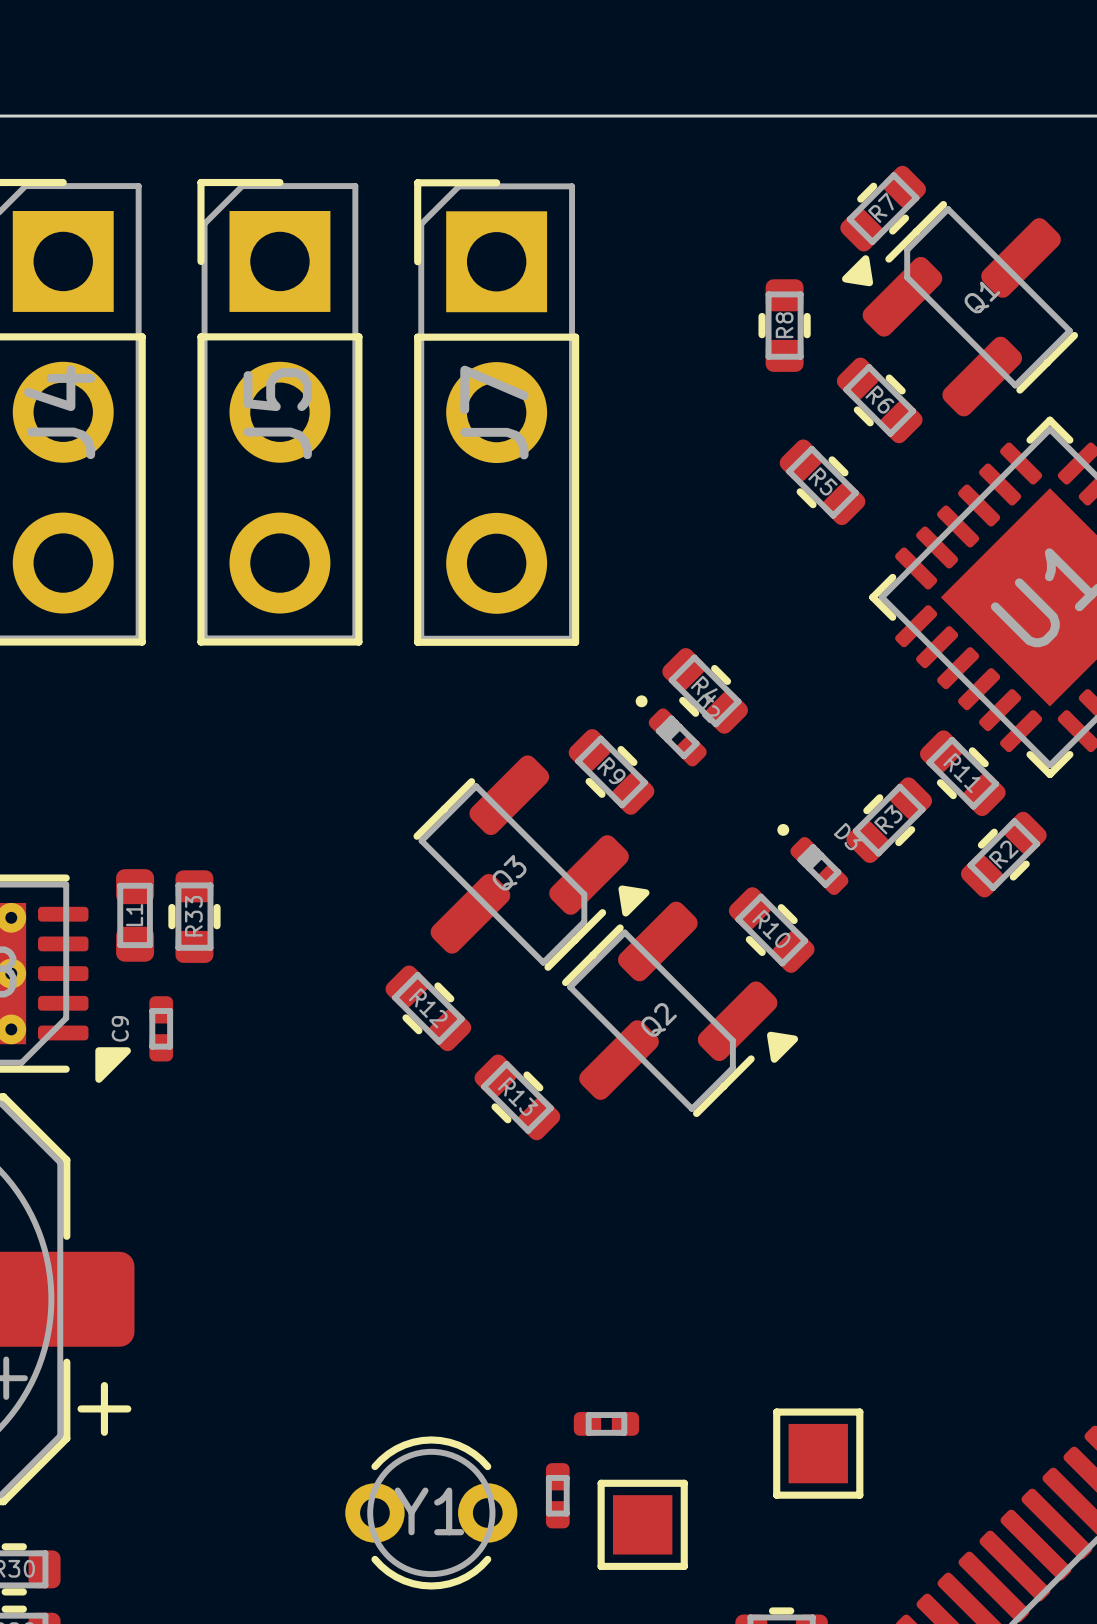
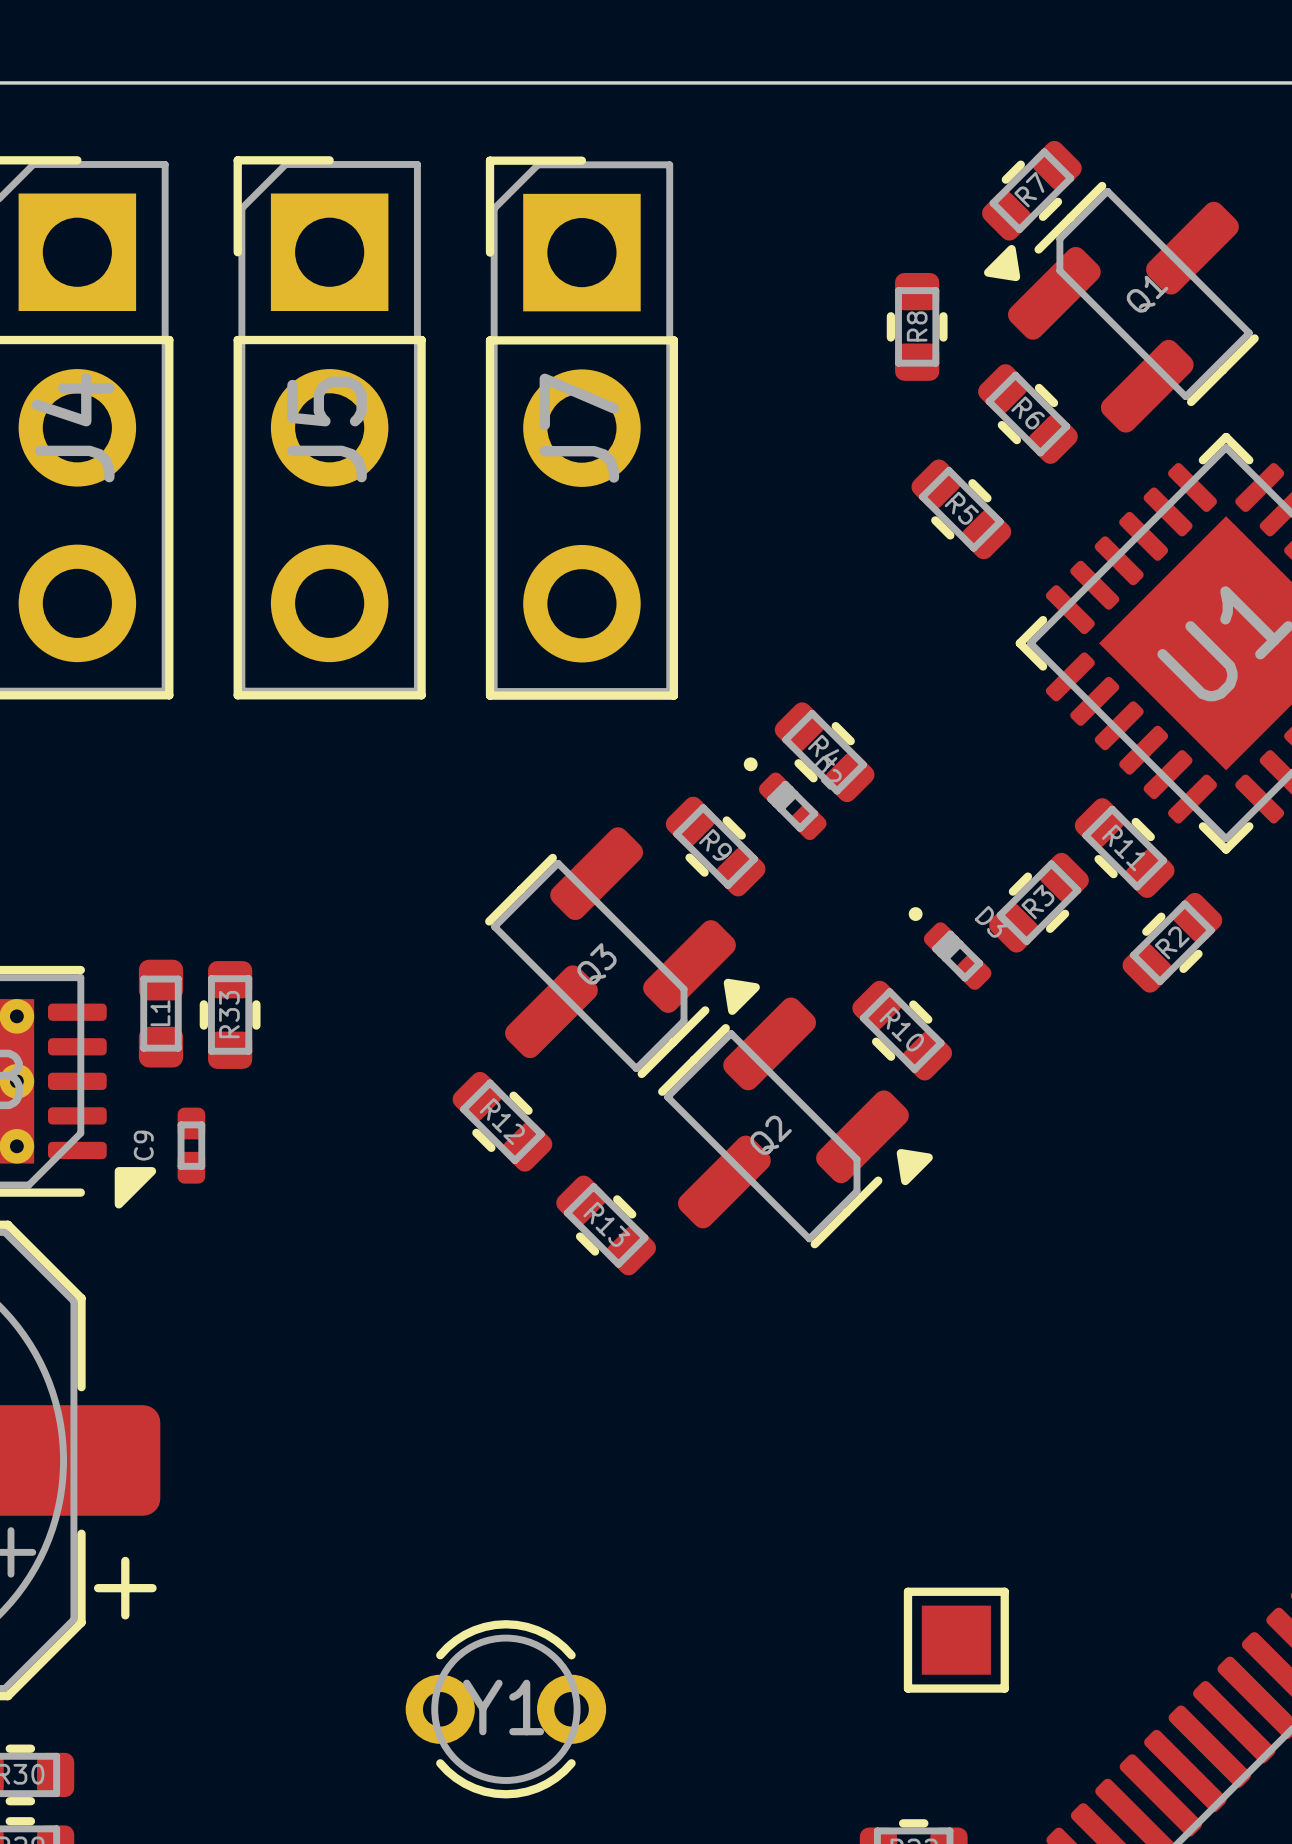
part: (606, 1423) -> none
part: (557, 1495) -> none
part: (642, 1524) -> none

